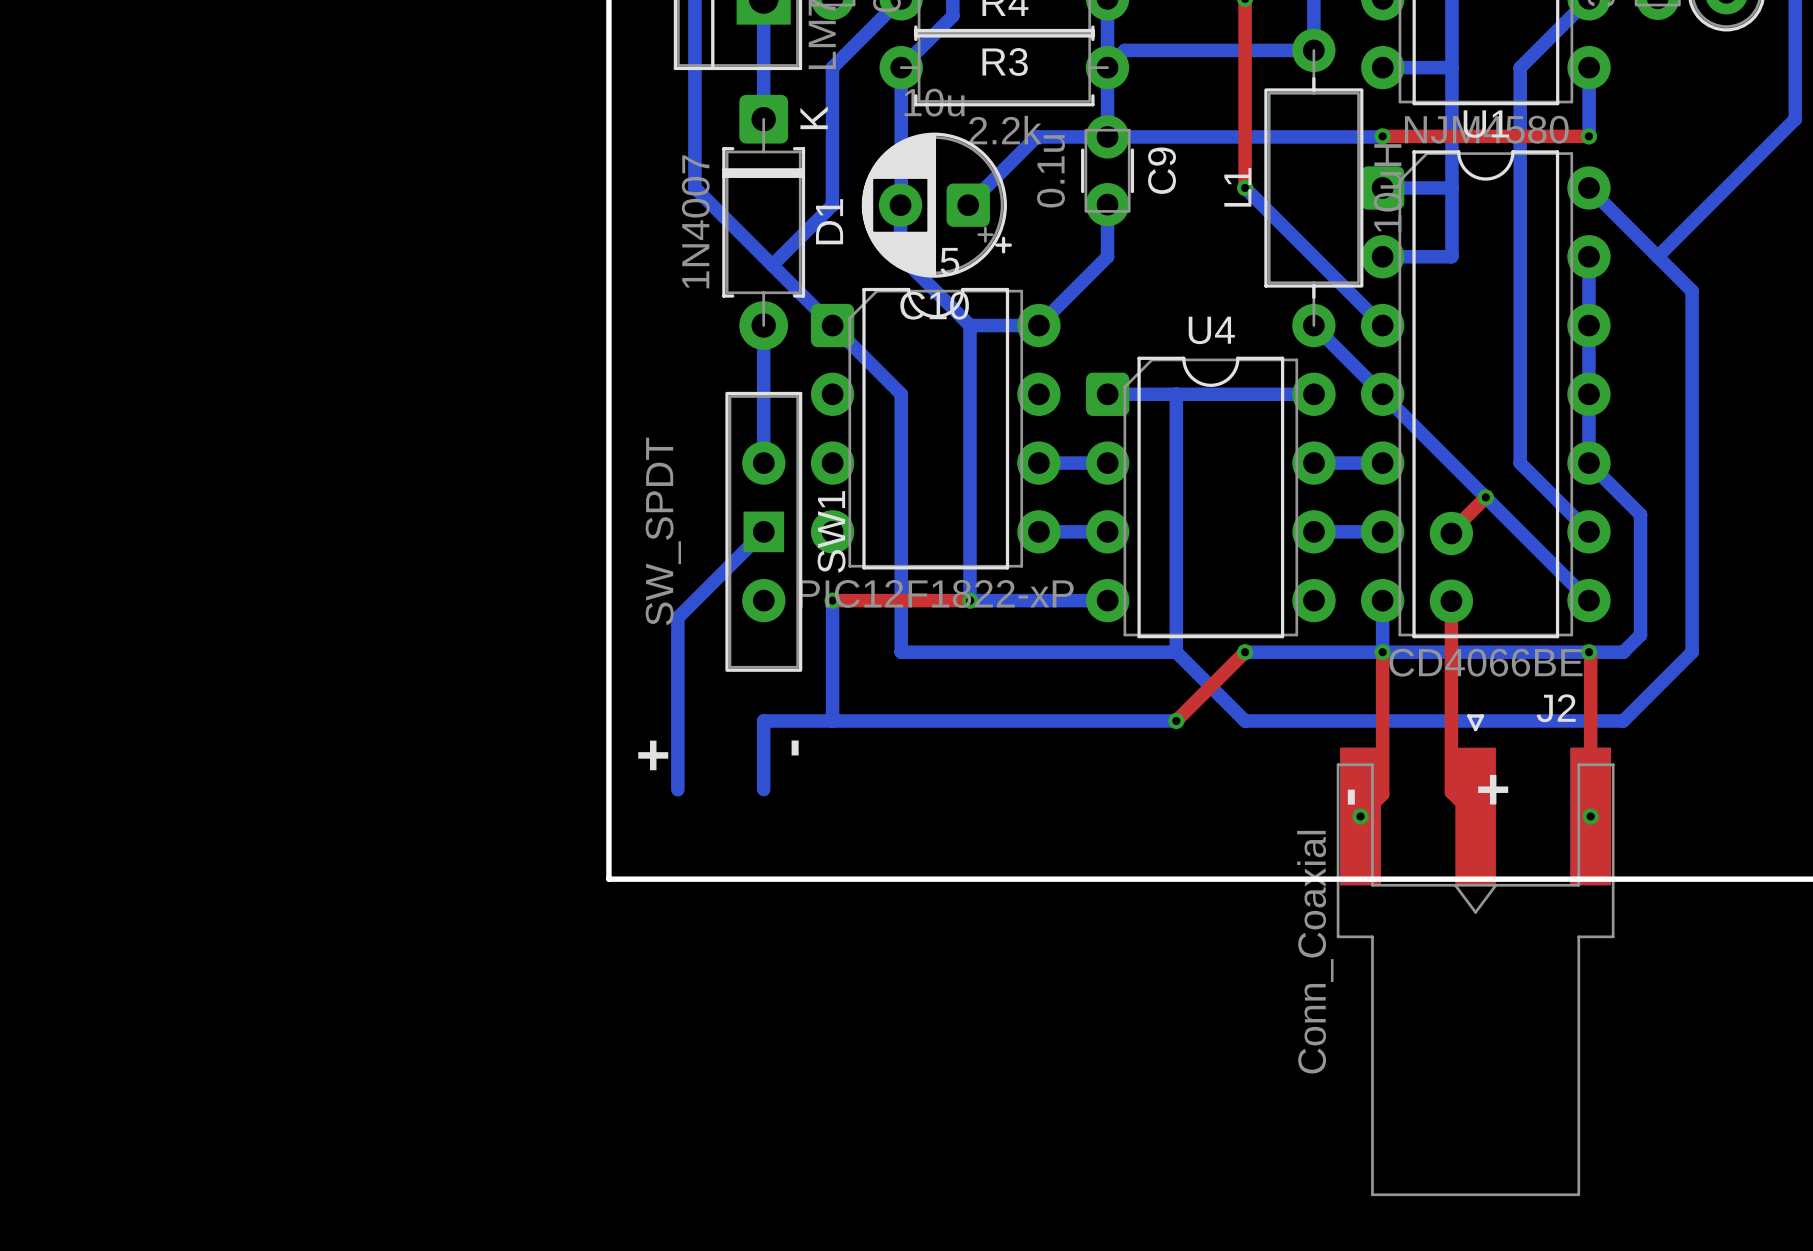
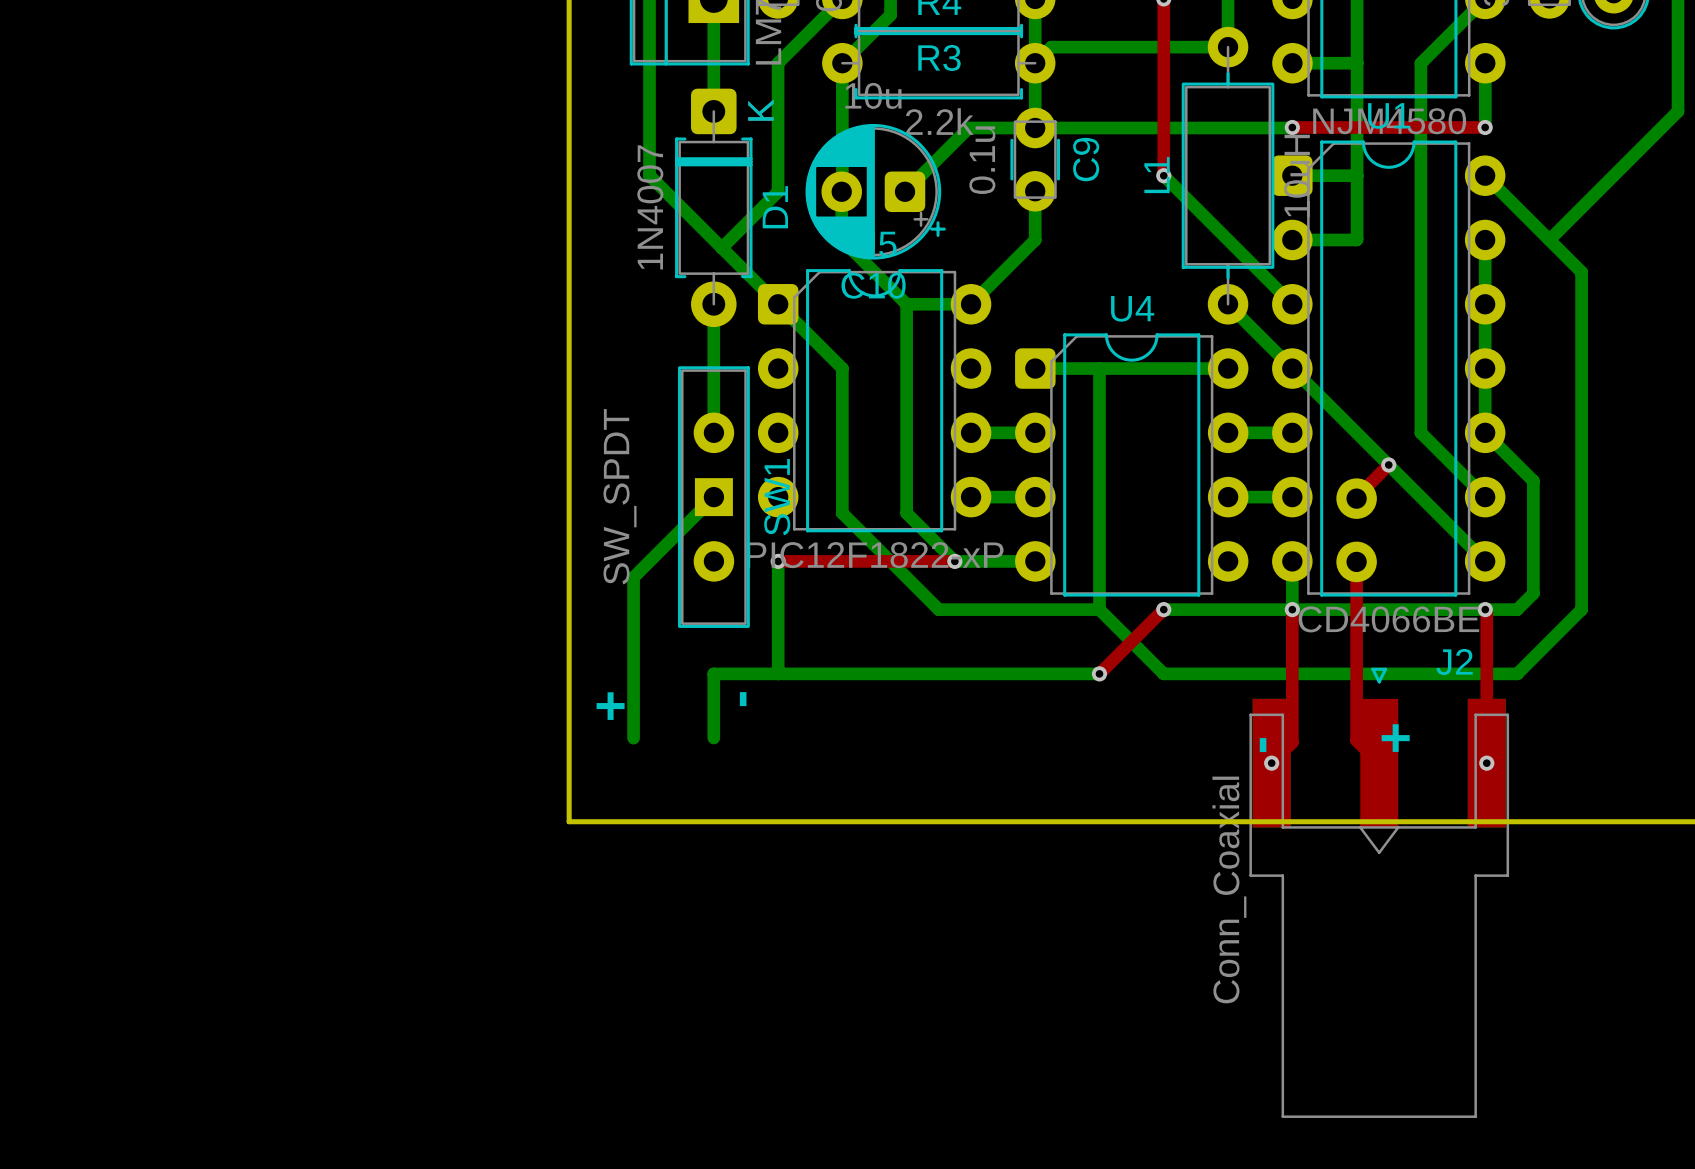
bottom track: (901, 549) (901, 652) -> (842, 513) (938, 609)
bottom track: (970, 549) (970, 600) -> (906, 513) (954, 561)
top track: none -> (906, 561) (954, 561)
bottom track: (970, 600) (1021, 600) -> none
via position: (970, 600) -> (954, 561)
bottom track: (901, 652) (1004, 652) -> none

